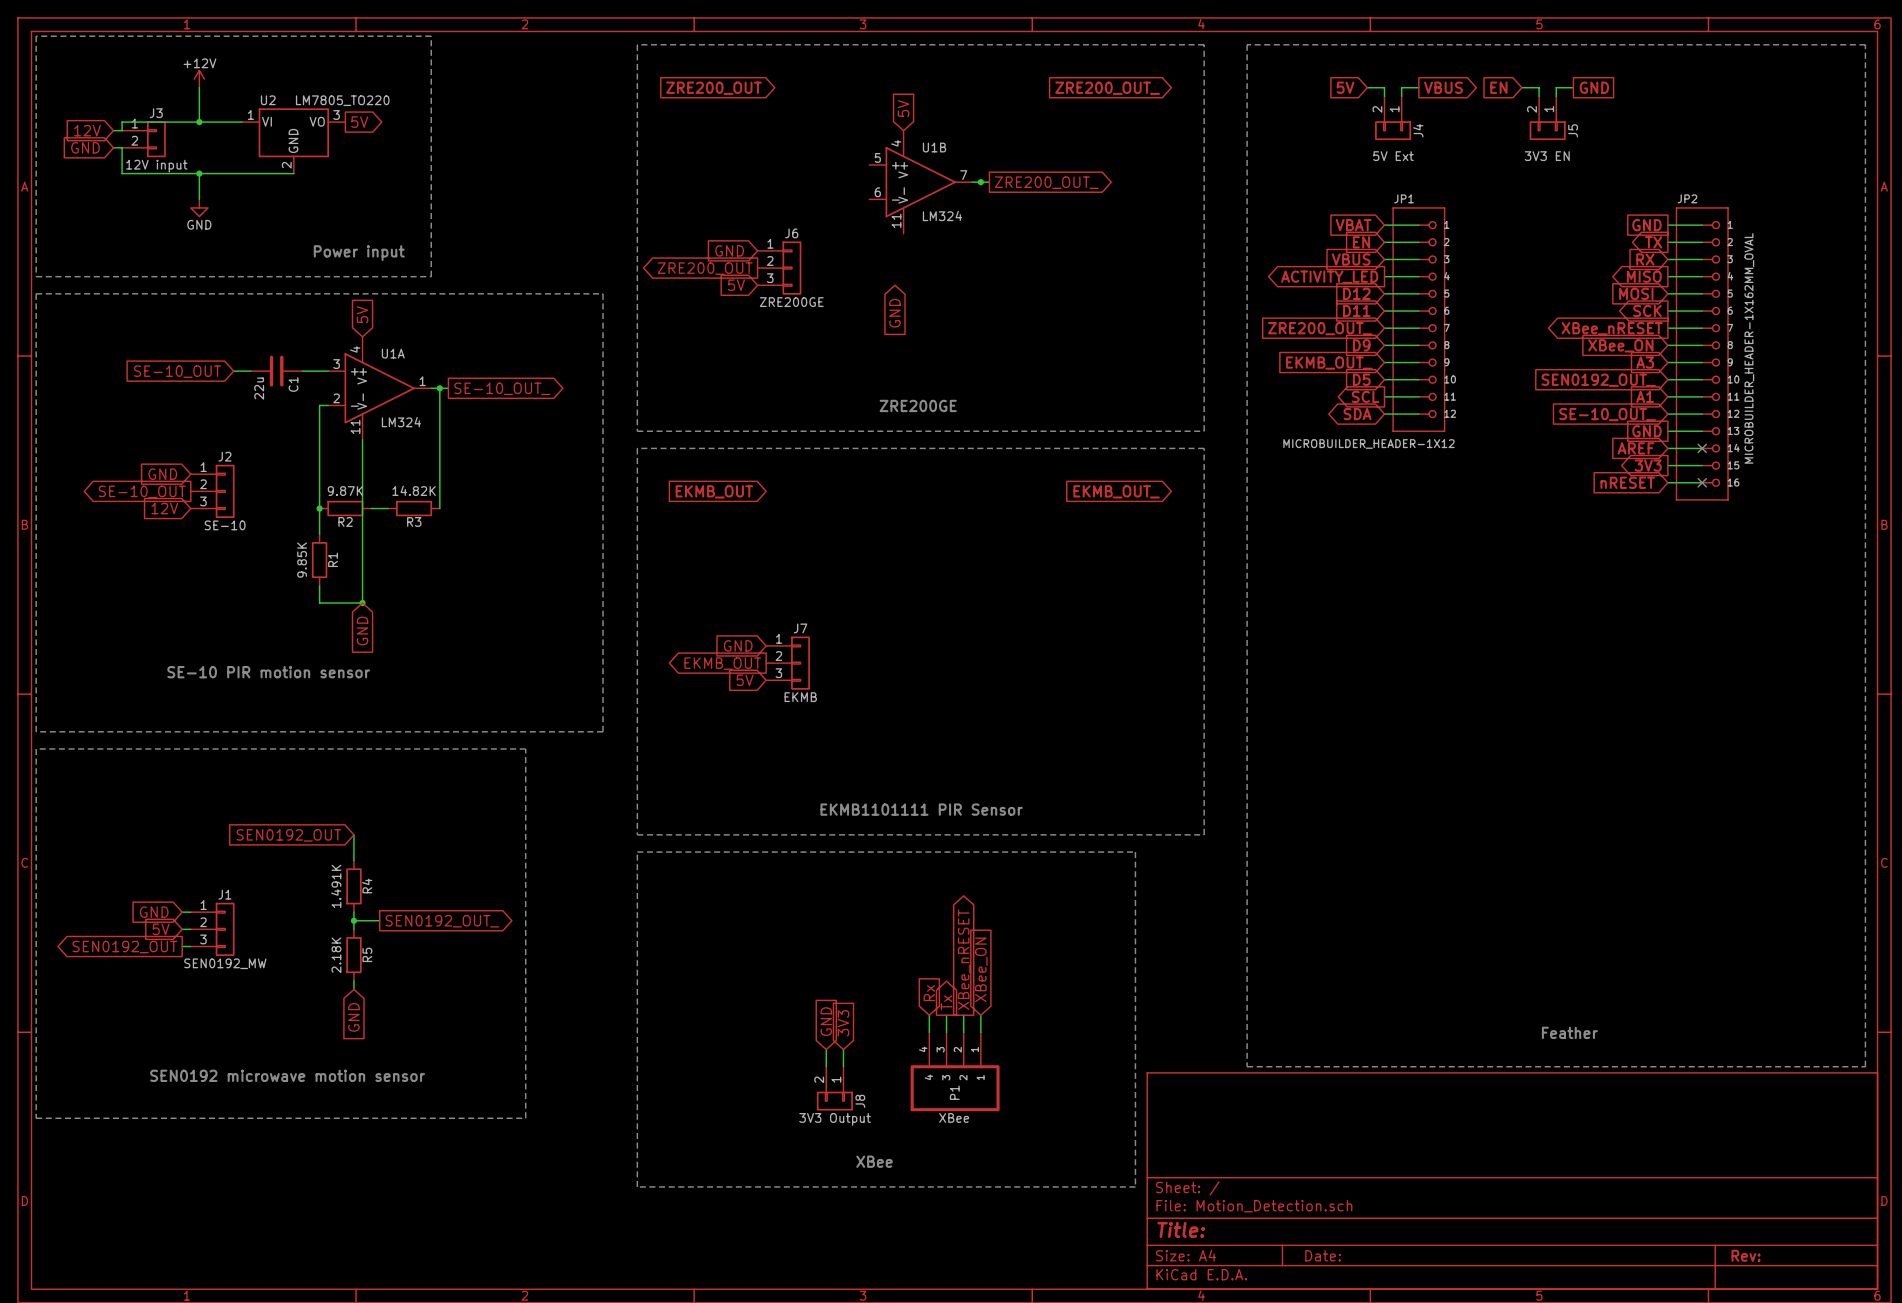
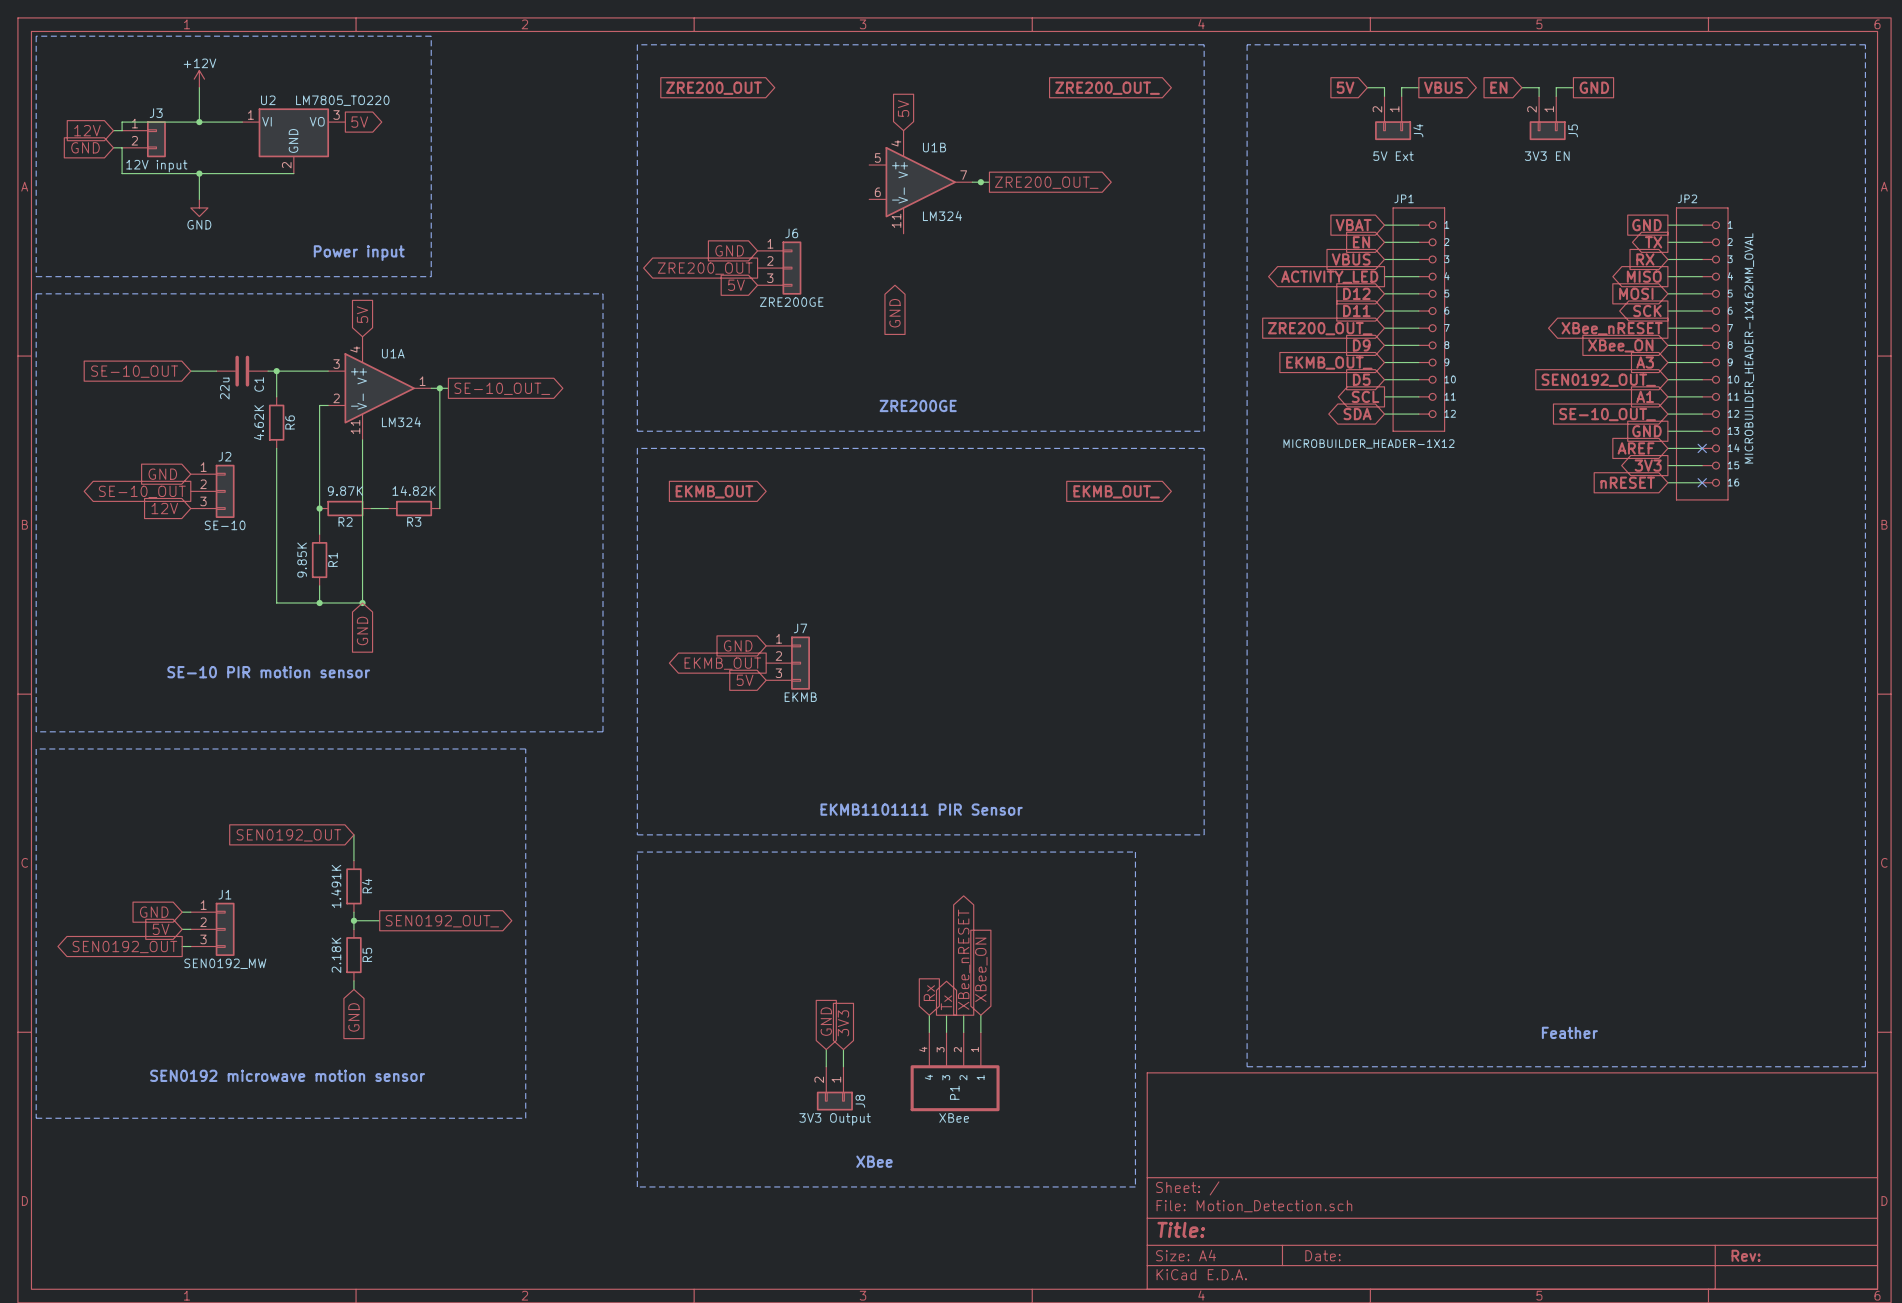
global label position: SE-10_OUT (177, 371) -> SE-10_OUT (134, 371)
wire: none -> (190, 371) (216, 371)
wire: none -> (276, 371) (276, 396)
C1 position: (276, 371) -> (242, 371)
junction: none -> (276, 371)
R6: none -> 4.62K (276, 422)
wire: none -> (276, 448) (276, 603) (319, 603)
junction: none -> (319, 603)

